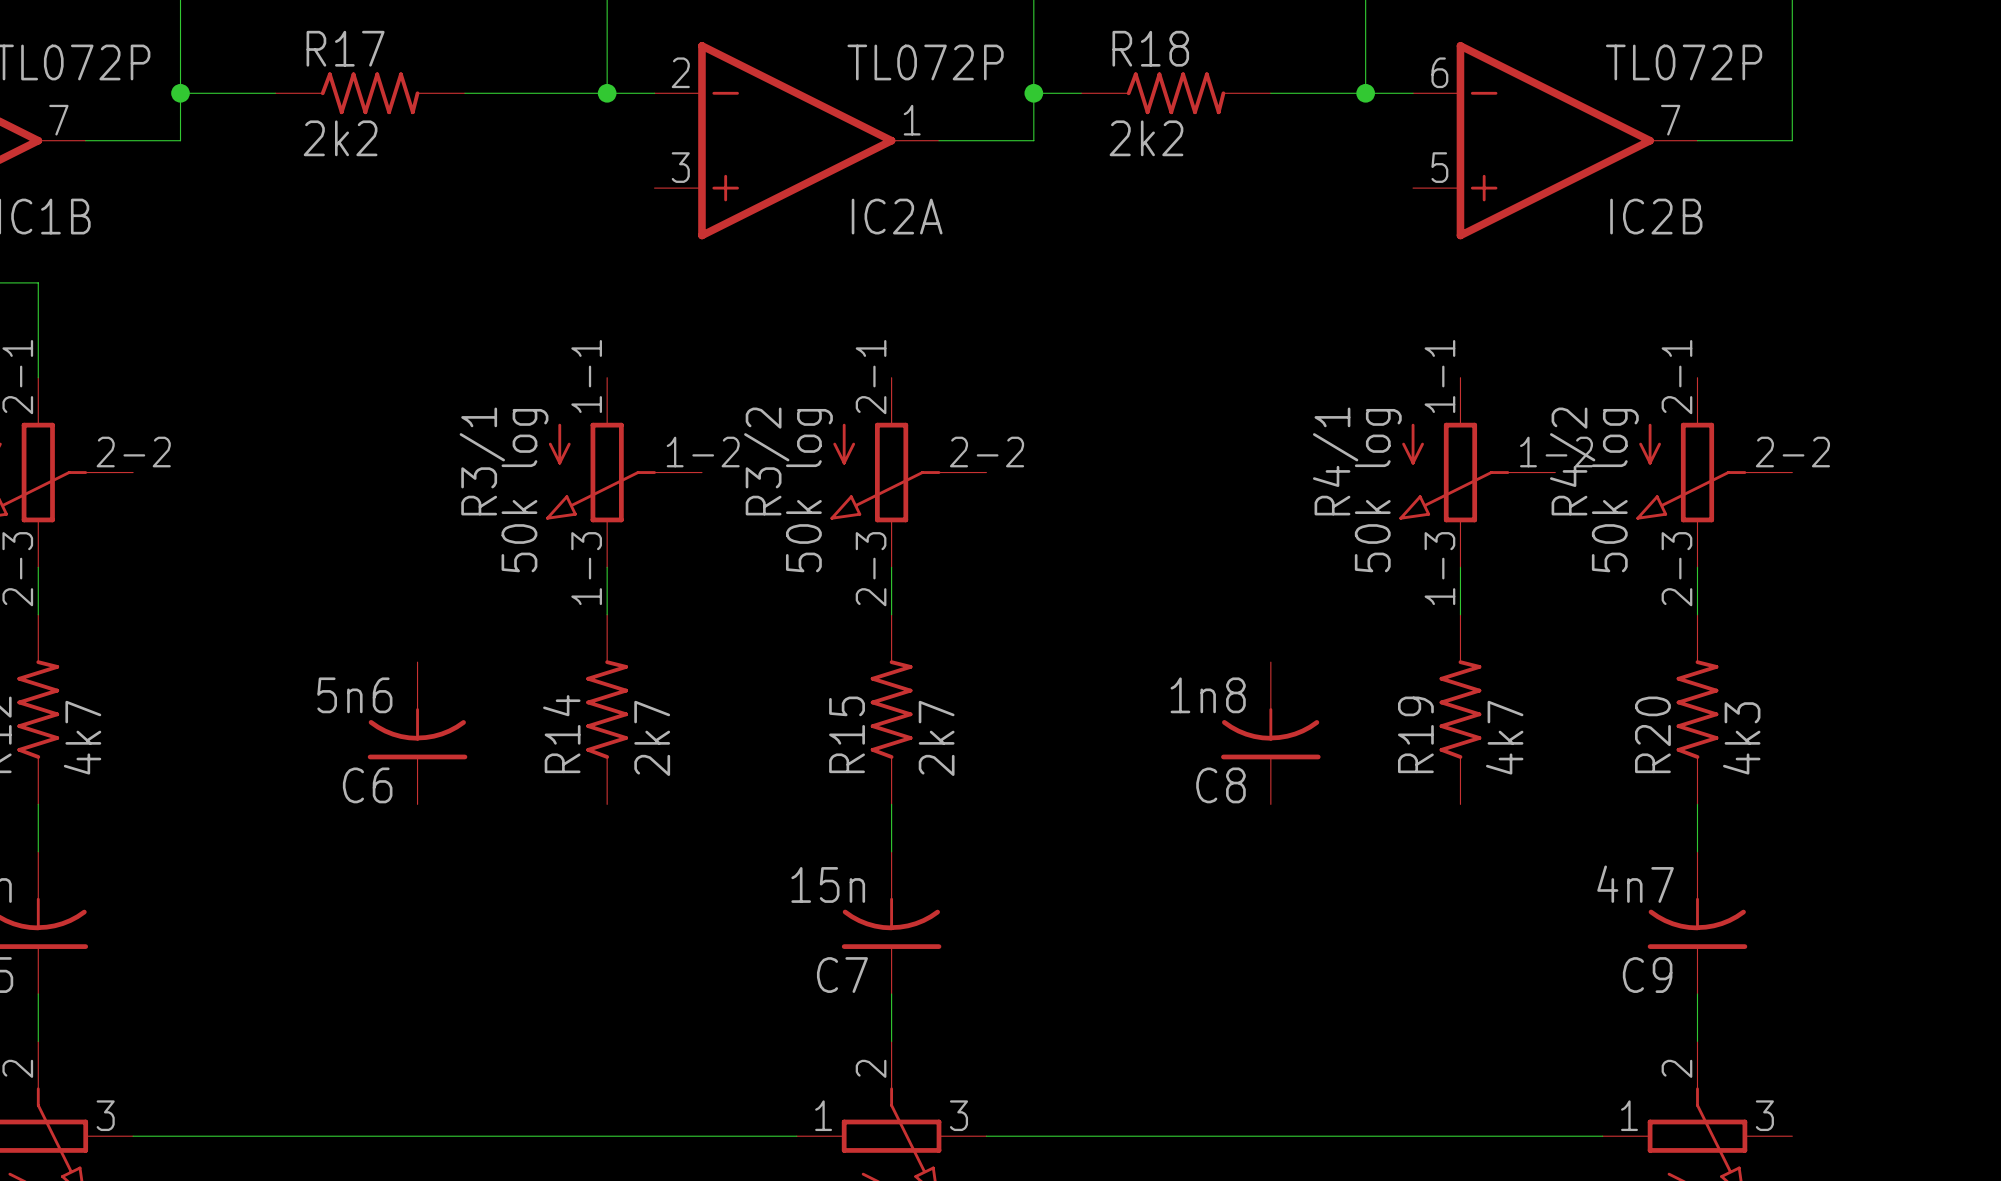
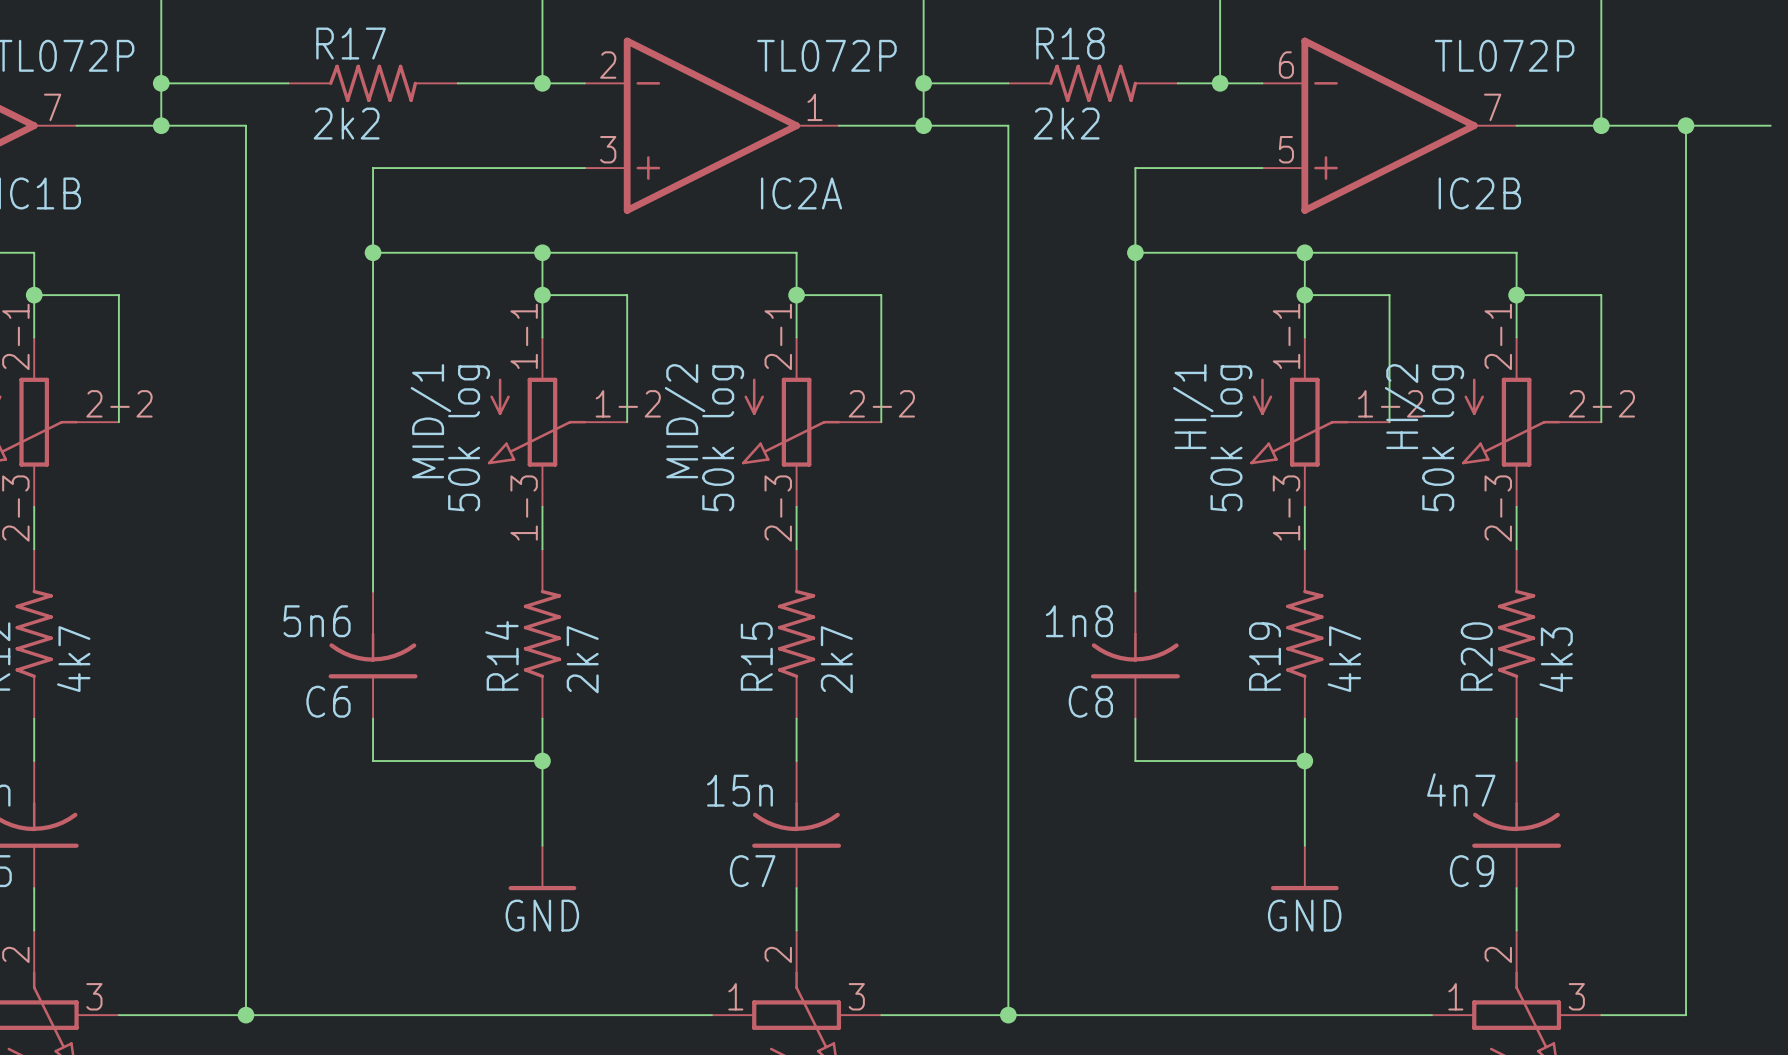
R17 position: (370, 93) -> (373, 83)
R18 position: (1176, 93) -> (1093, 83)
wire: none -> (161, 125) (245, 125) (245, 1015)
junction: none -> (161, 125)
wire: none -> (923, 125) (1008, 125) (1008, 1015)
junction: none -> (923, 125)
wire: none -> (1601, 125) (1770, 125)
junction: none -> (1601, 125)
wire: none -> (1686, 125) (1686, 1015) (1601, 1015)
junction: none -> (1686, 125)
wire: none -> (584, 168) (373, 168) (373, 591)
wire: none -> (1262, 168) (1135, 168) (1135, 591)
wire: none -> (373, 252) (796, 252) (796, 337)
junction: none -> (373, 252)
wire: none -> (542, 252) (542, 337)
junction: none -> (542, 252)
wire: none -> (1135, 252) (1516, 252) (1516, 337)
junction: none -> (1135, 252)
wire: none -> (1304, 252) (1304, 337)
junction: none -> (1304, 252)
wire: none -> (34, 295) (118, 295) (118, 422)
junction: none -> (34, 295)
wire: none -> (542, 295) (627, 295) (627, 422)
junction: none -> (542, 295)
wire: none -> (796, 295) (881, 295) (881, 422)
junction: none -> (796, 295)
wire: none -> (1304, 295) (1389, 295) (1389, 422)
junction: none -> (1304, 295)
wire: none -> (1516, 295) (1601, 295) (1601, 422)
junction: none -> (1516, 295)
R3/1 name: R3/1 (482, 461) -> MID/1 (430, 421)
R3/2 name: R3/2 (766, 461) -> MID/2 (685, 421)
R4/1 name: R4/1 (1335, 461) -> HI/1 (1193, 406)
R4/2 name: R4/2 (1572, 461) -> HI/2 (1405, 406)
wire: none -> (373, 718) (373, 761) (542, 761)
wire: none -> (542, 718) (542, 845)
wire: none -> (1135, 718) (1135, 761) (1304, 761)
wire: none -> (1304, 718) (1304, 845)
junction: none -> (542, 761)
junction: none -> (1304, 761)
power symbol: none -> GND (542, 867)
power symbol: none -> GND (1304, 867)
junction: none -> (245, 1015)
junction: none -> (1008, 1015)

